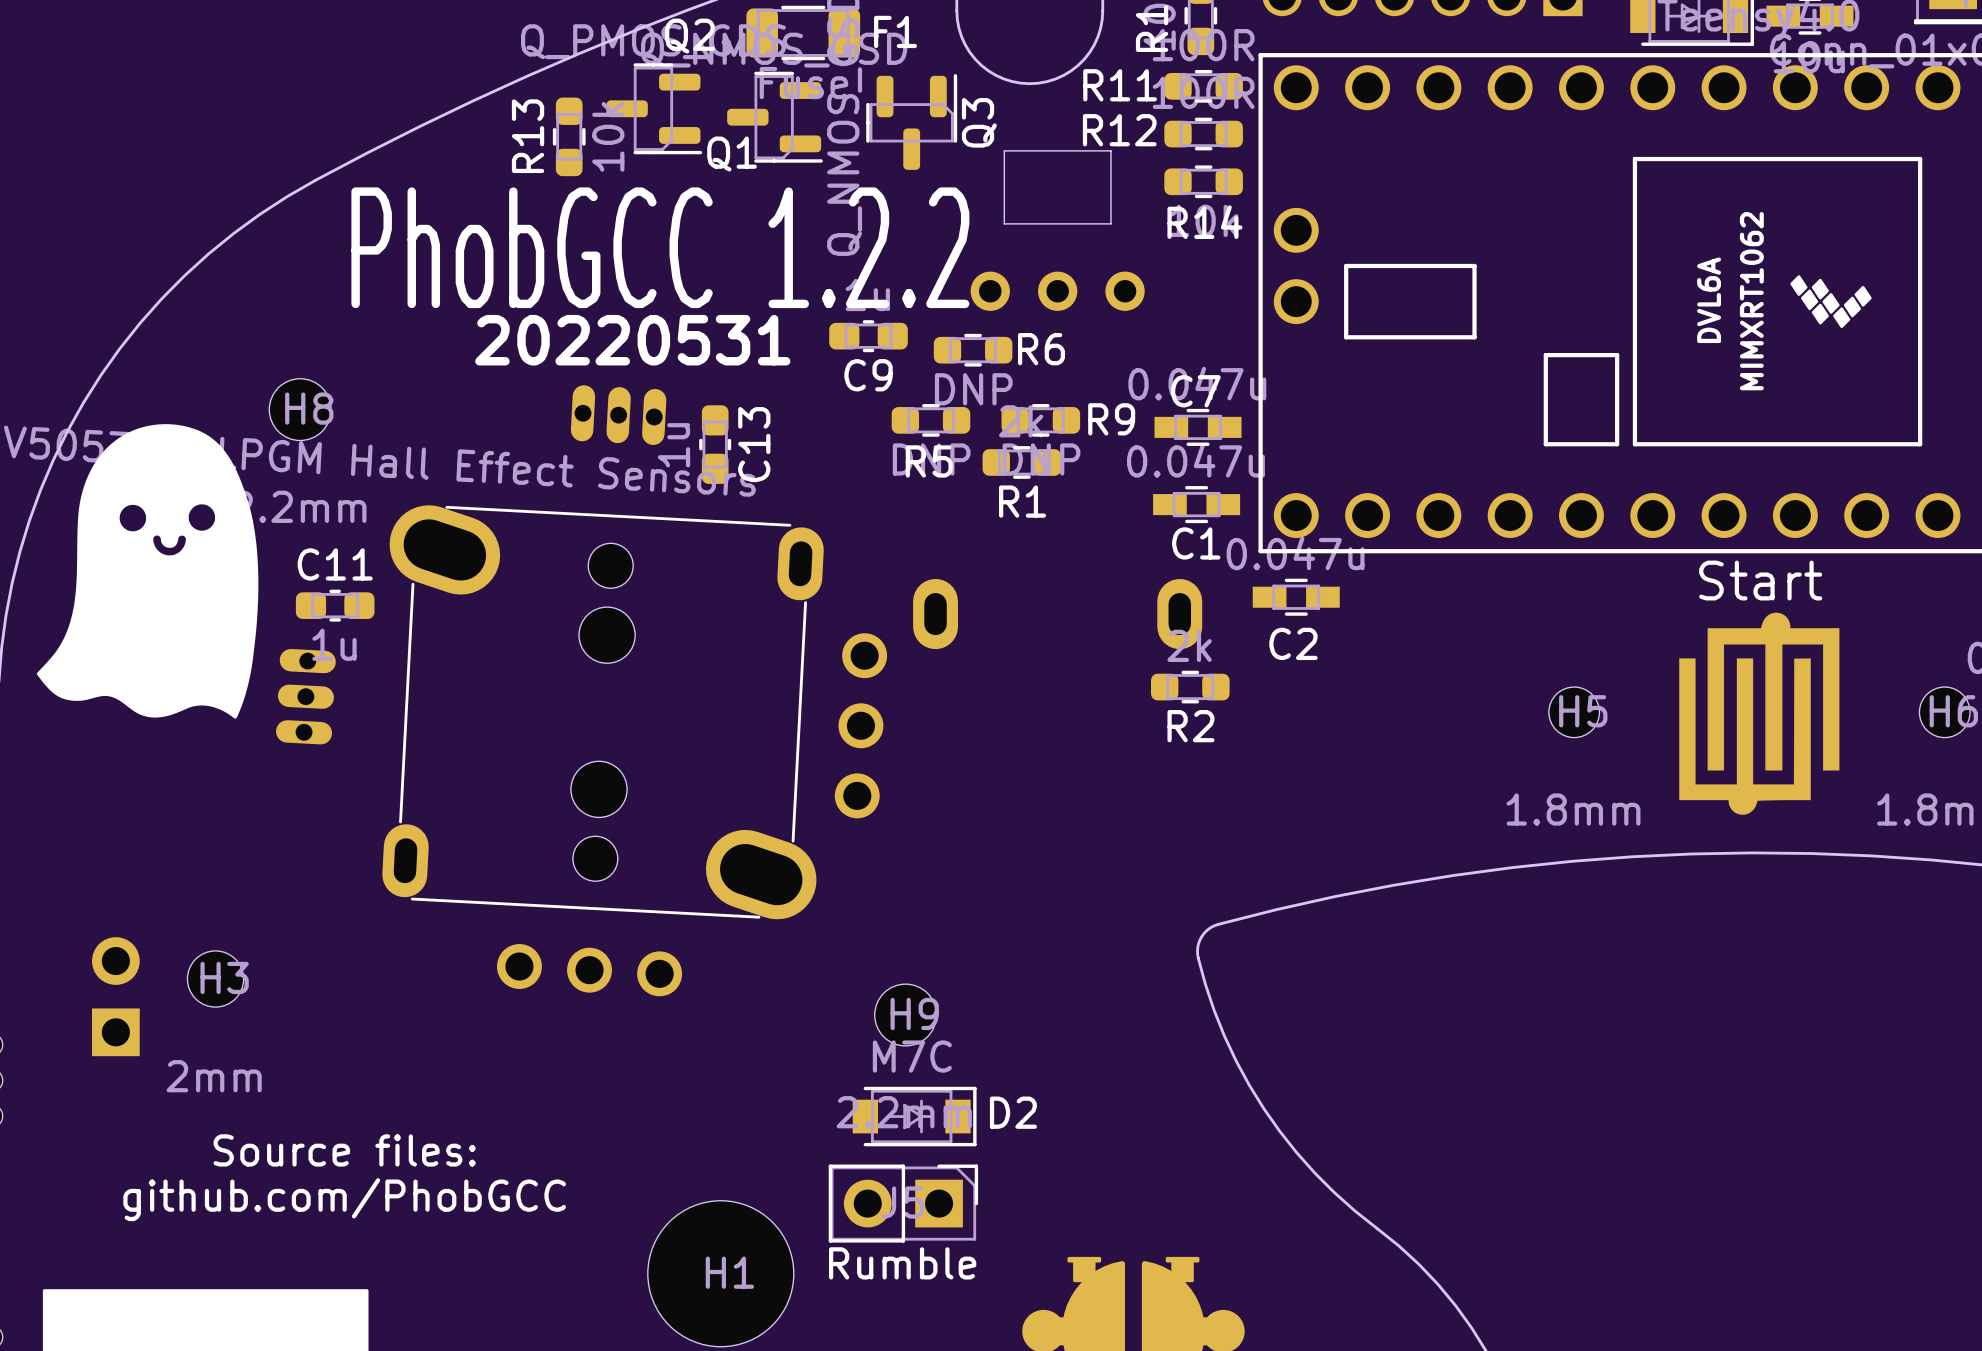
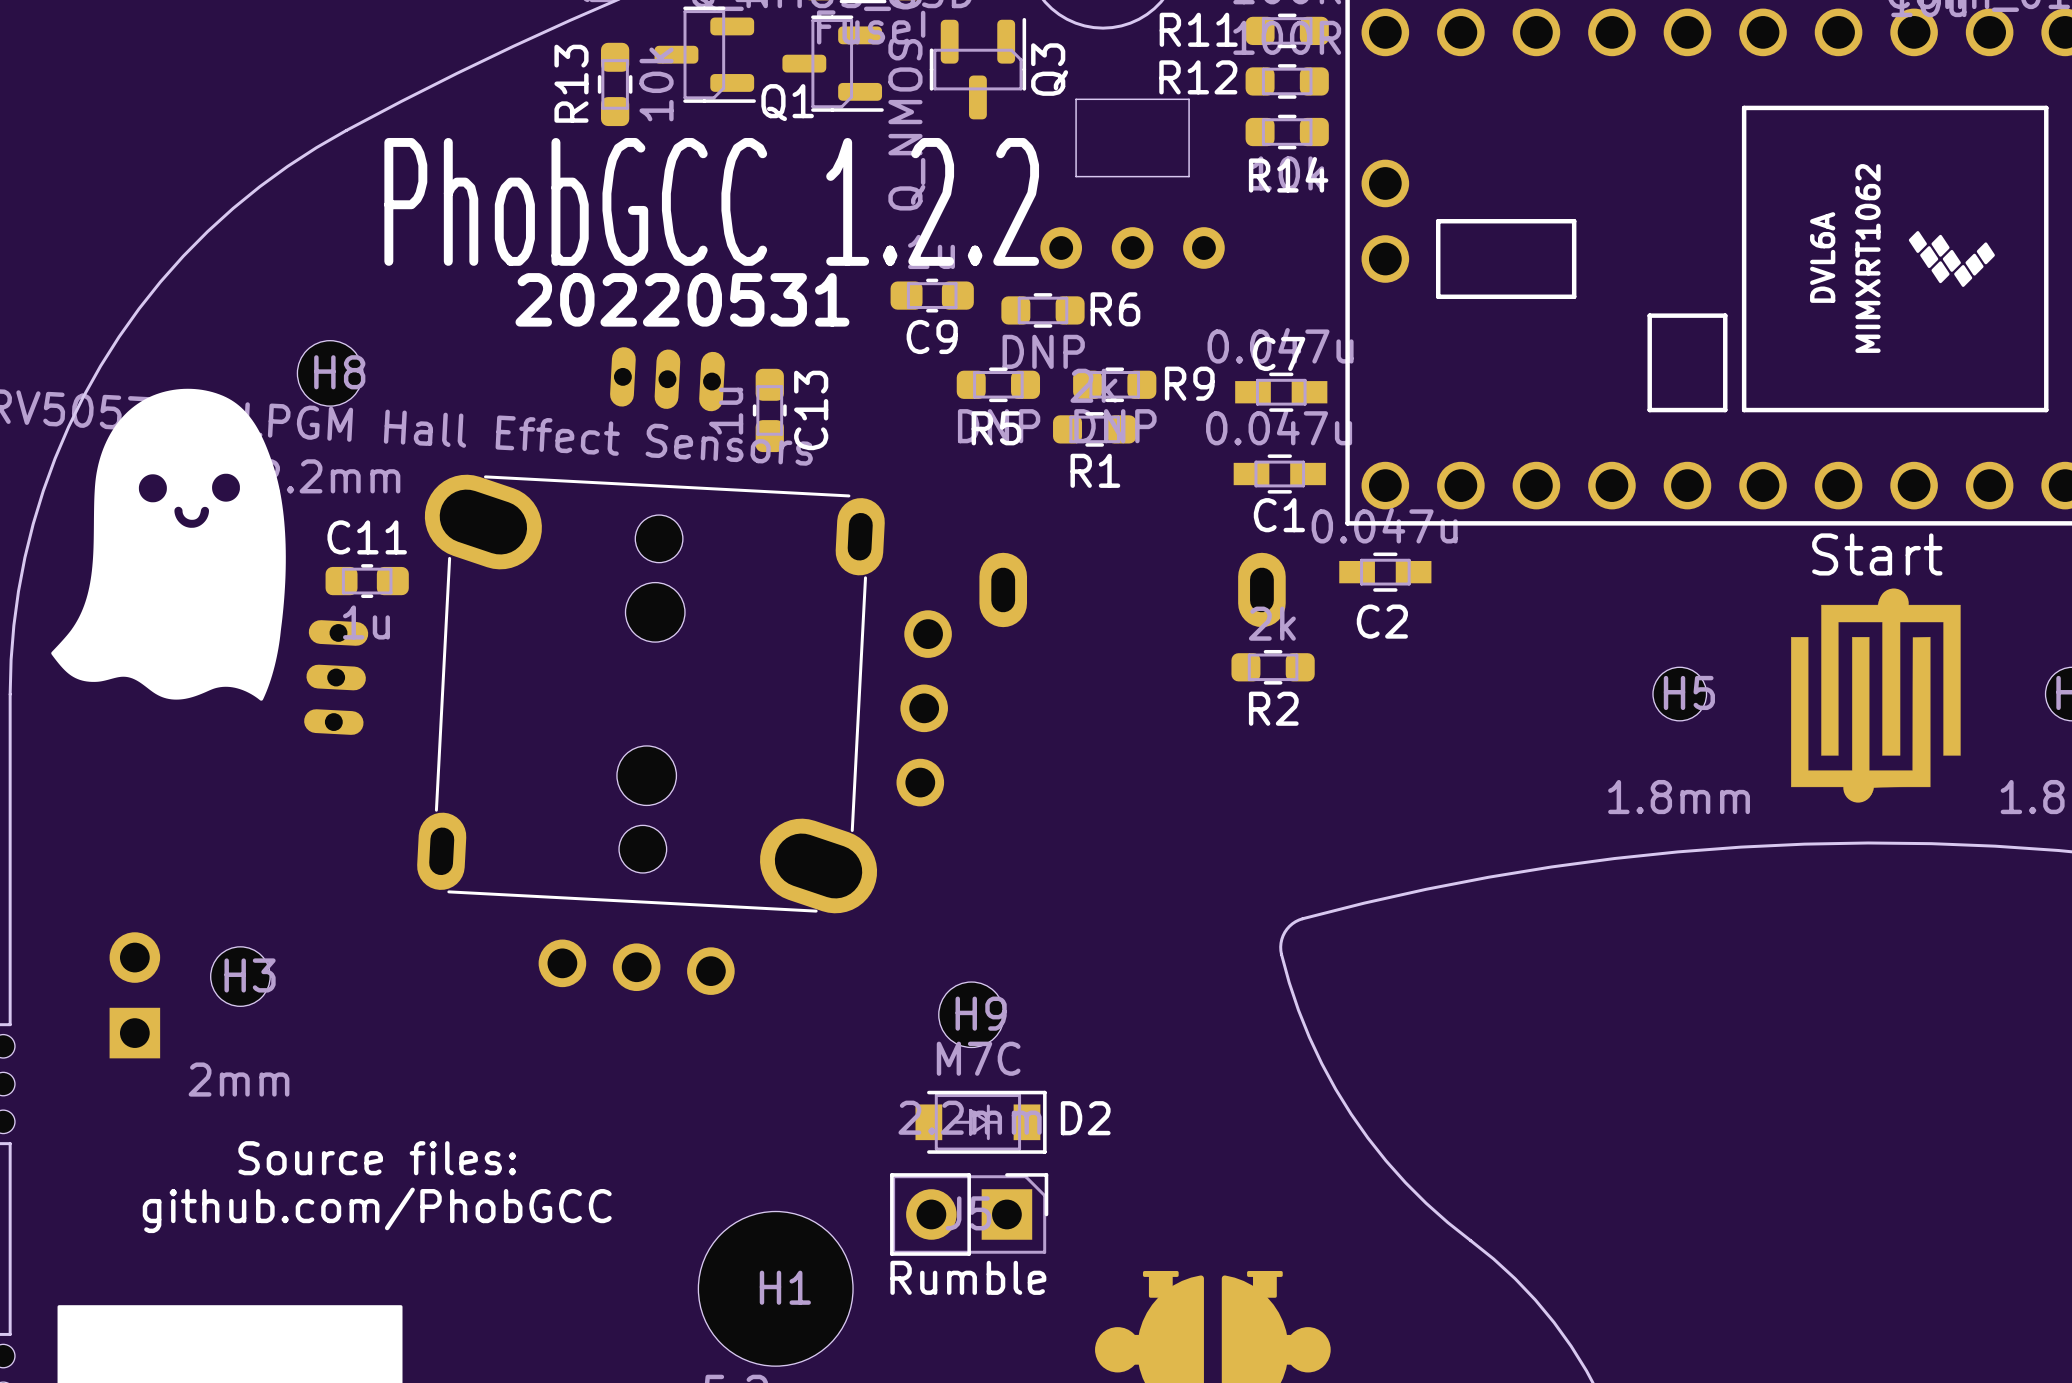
part footprint: [275, 385, 888, 997] -> [304, 347, 952, 995]

